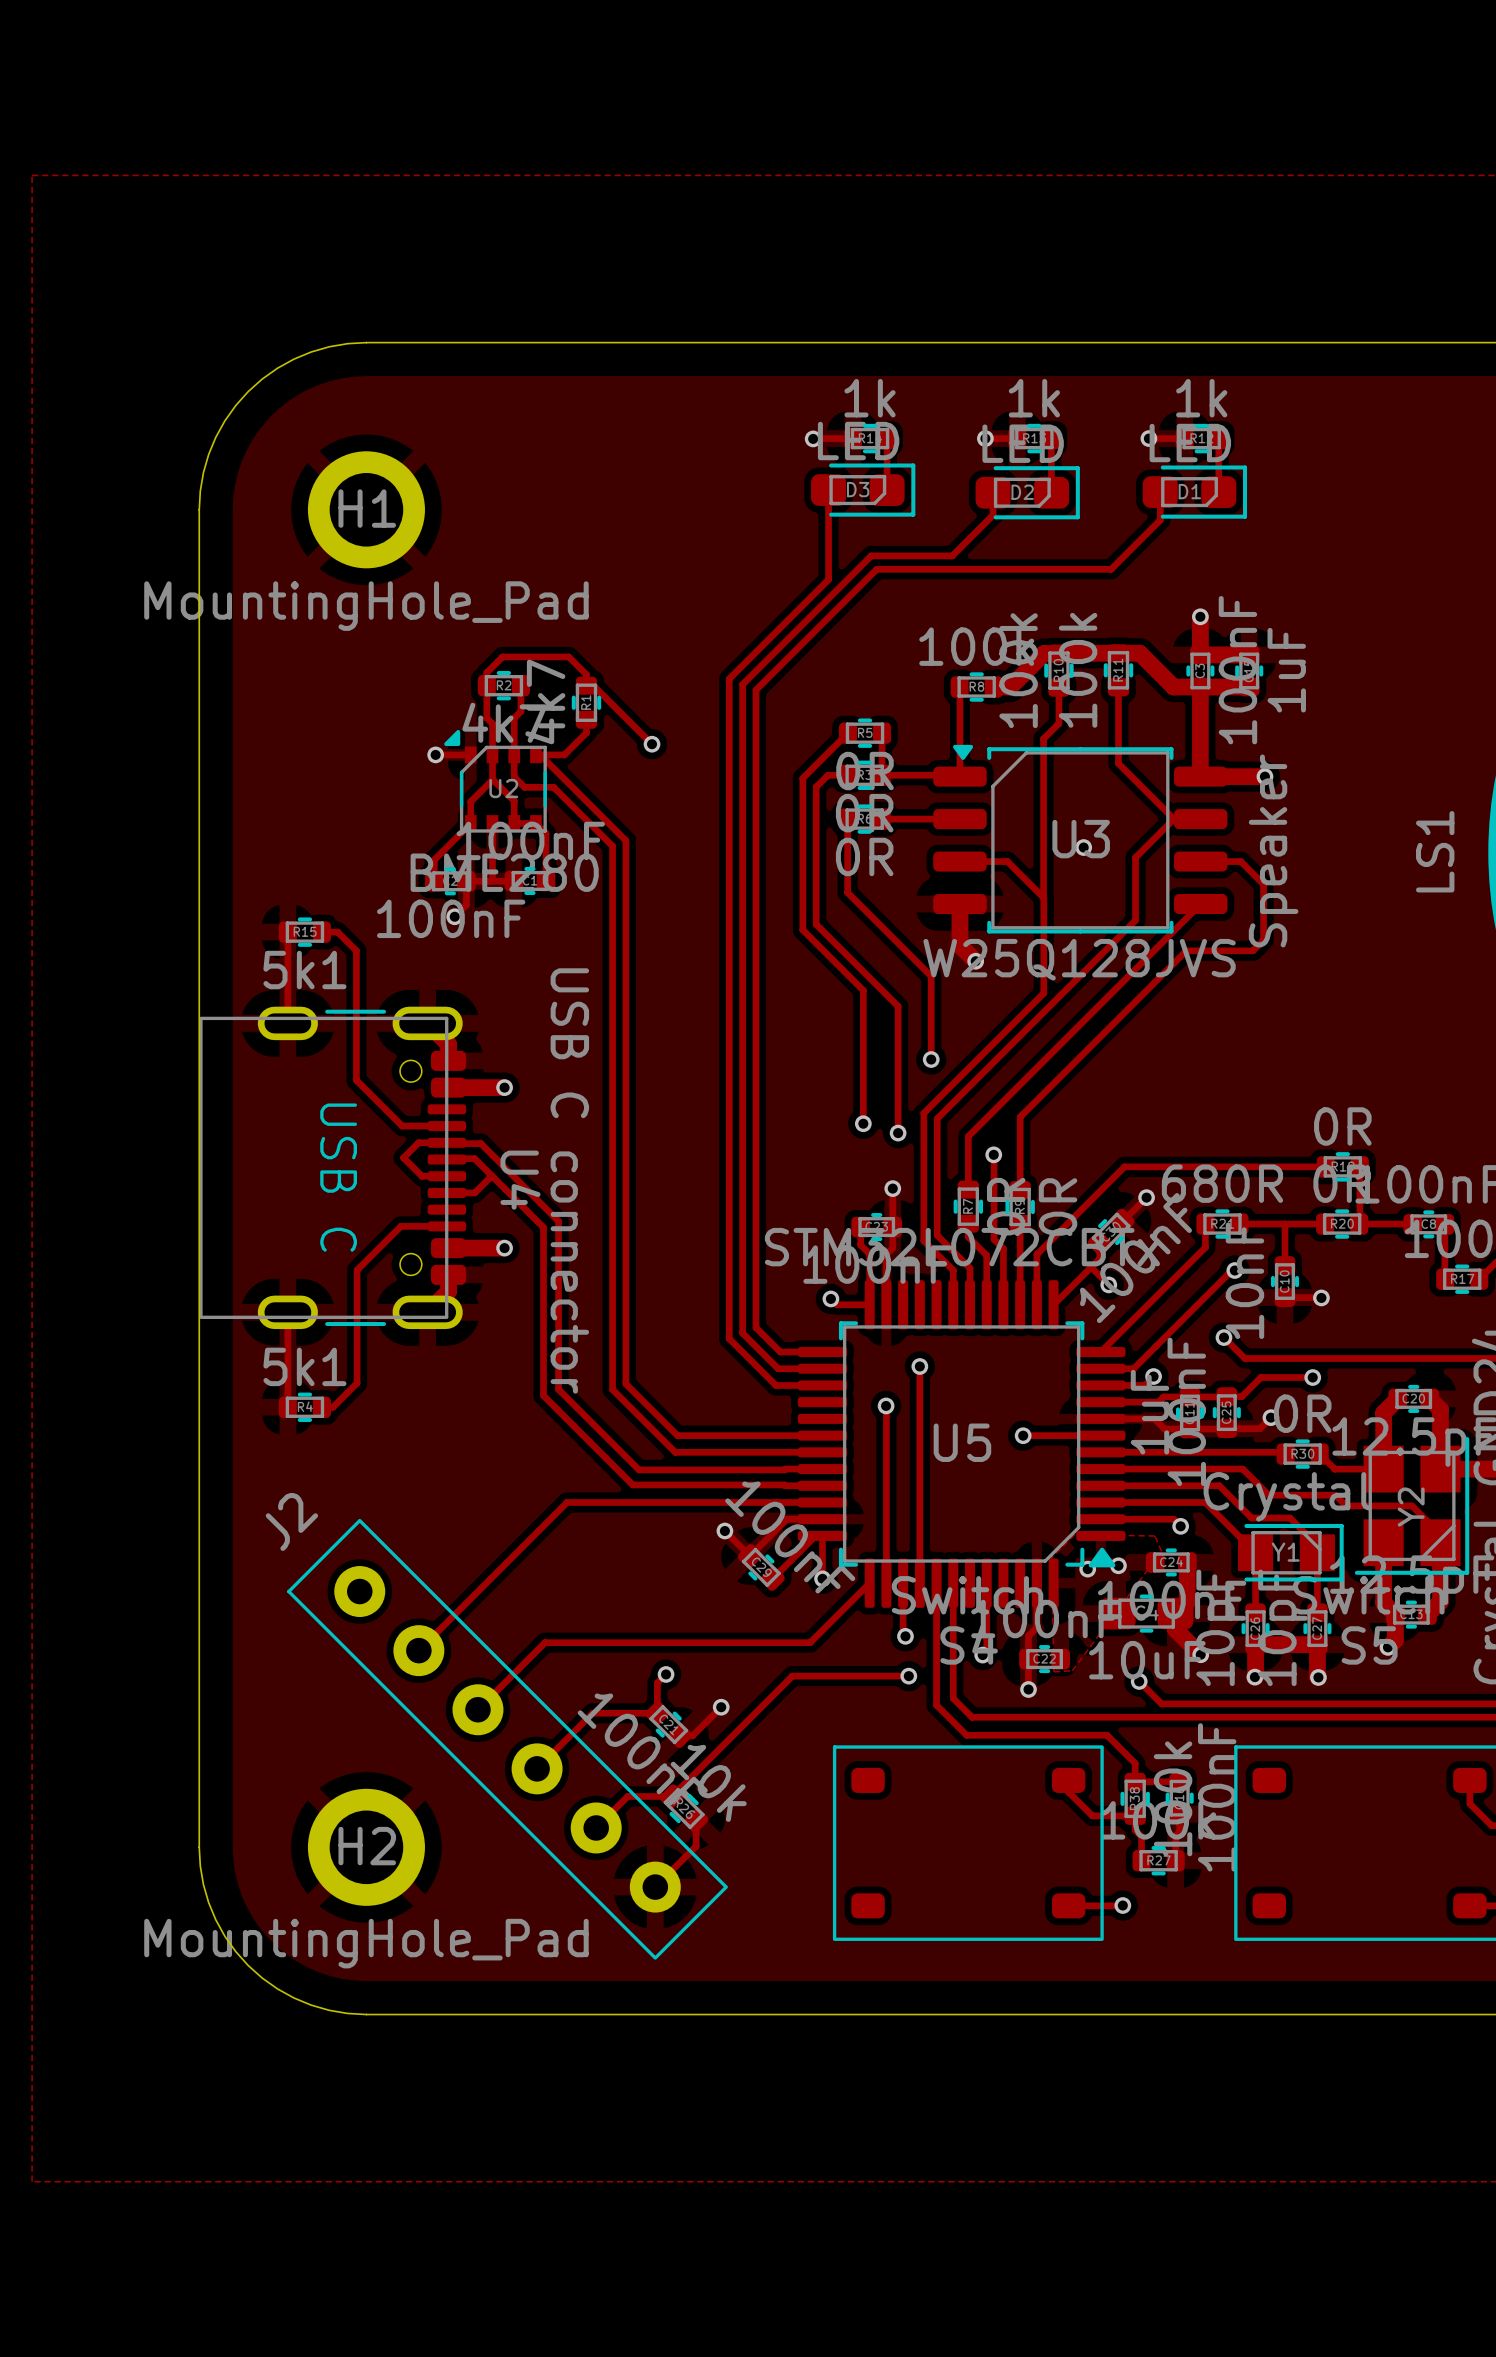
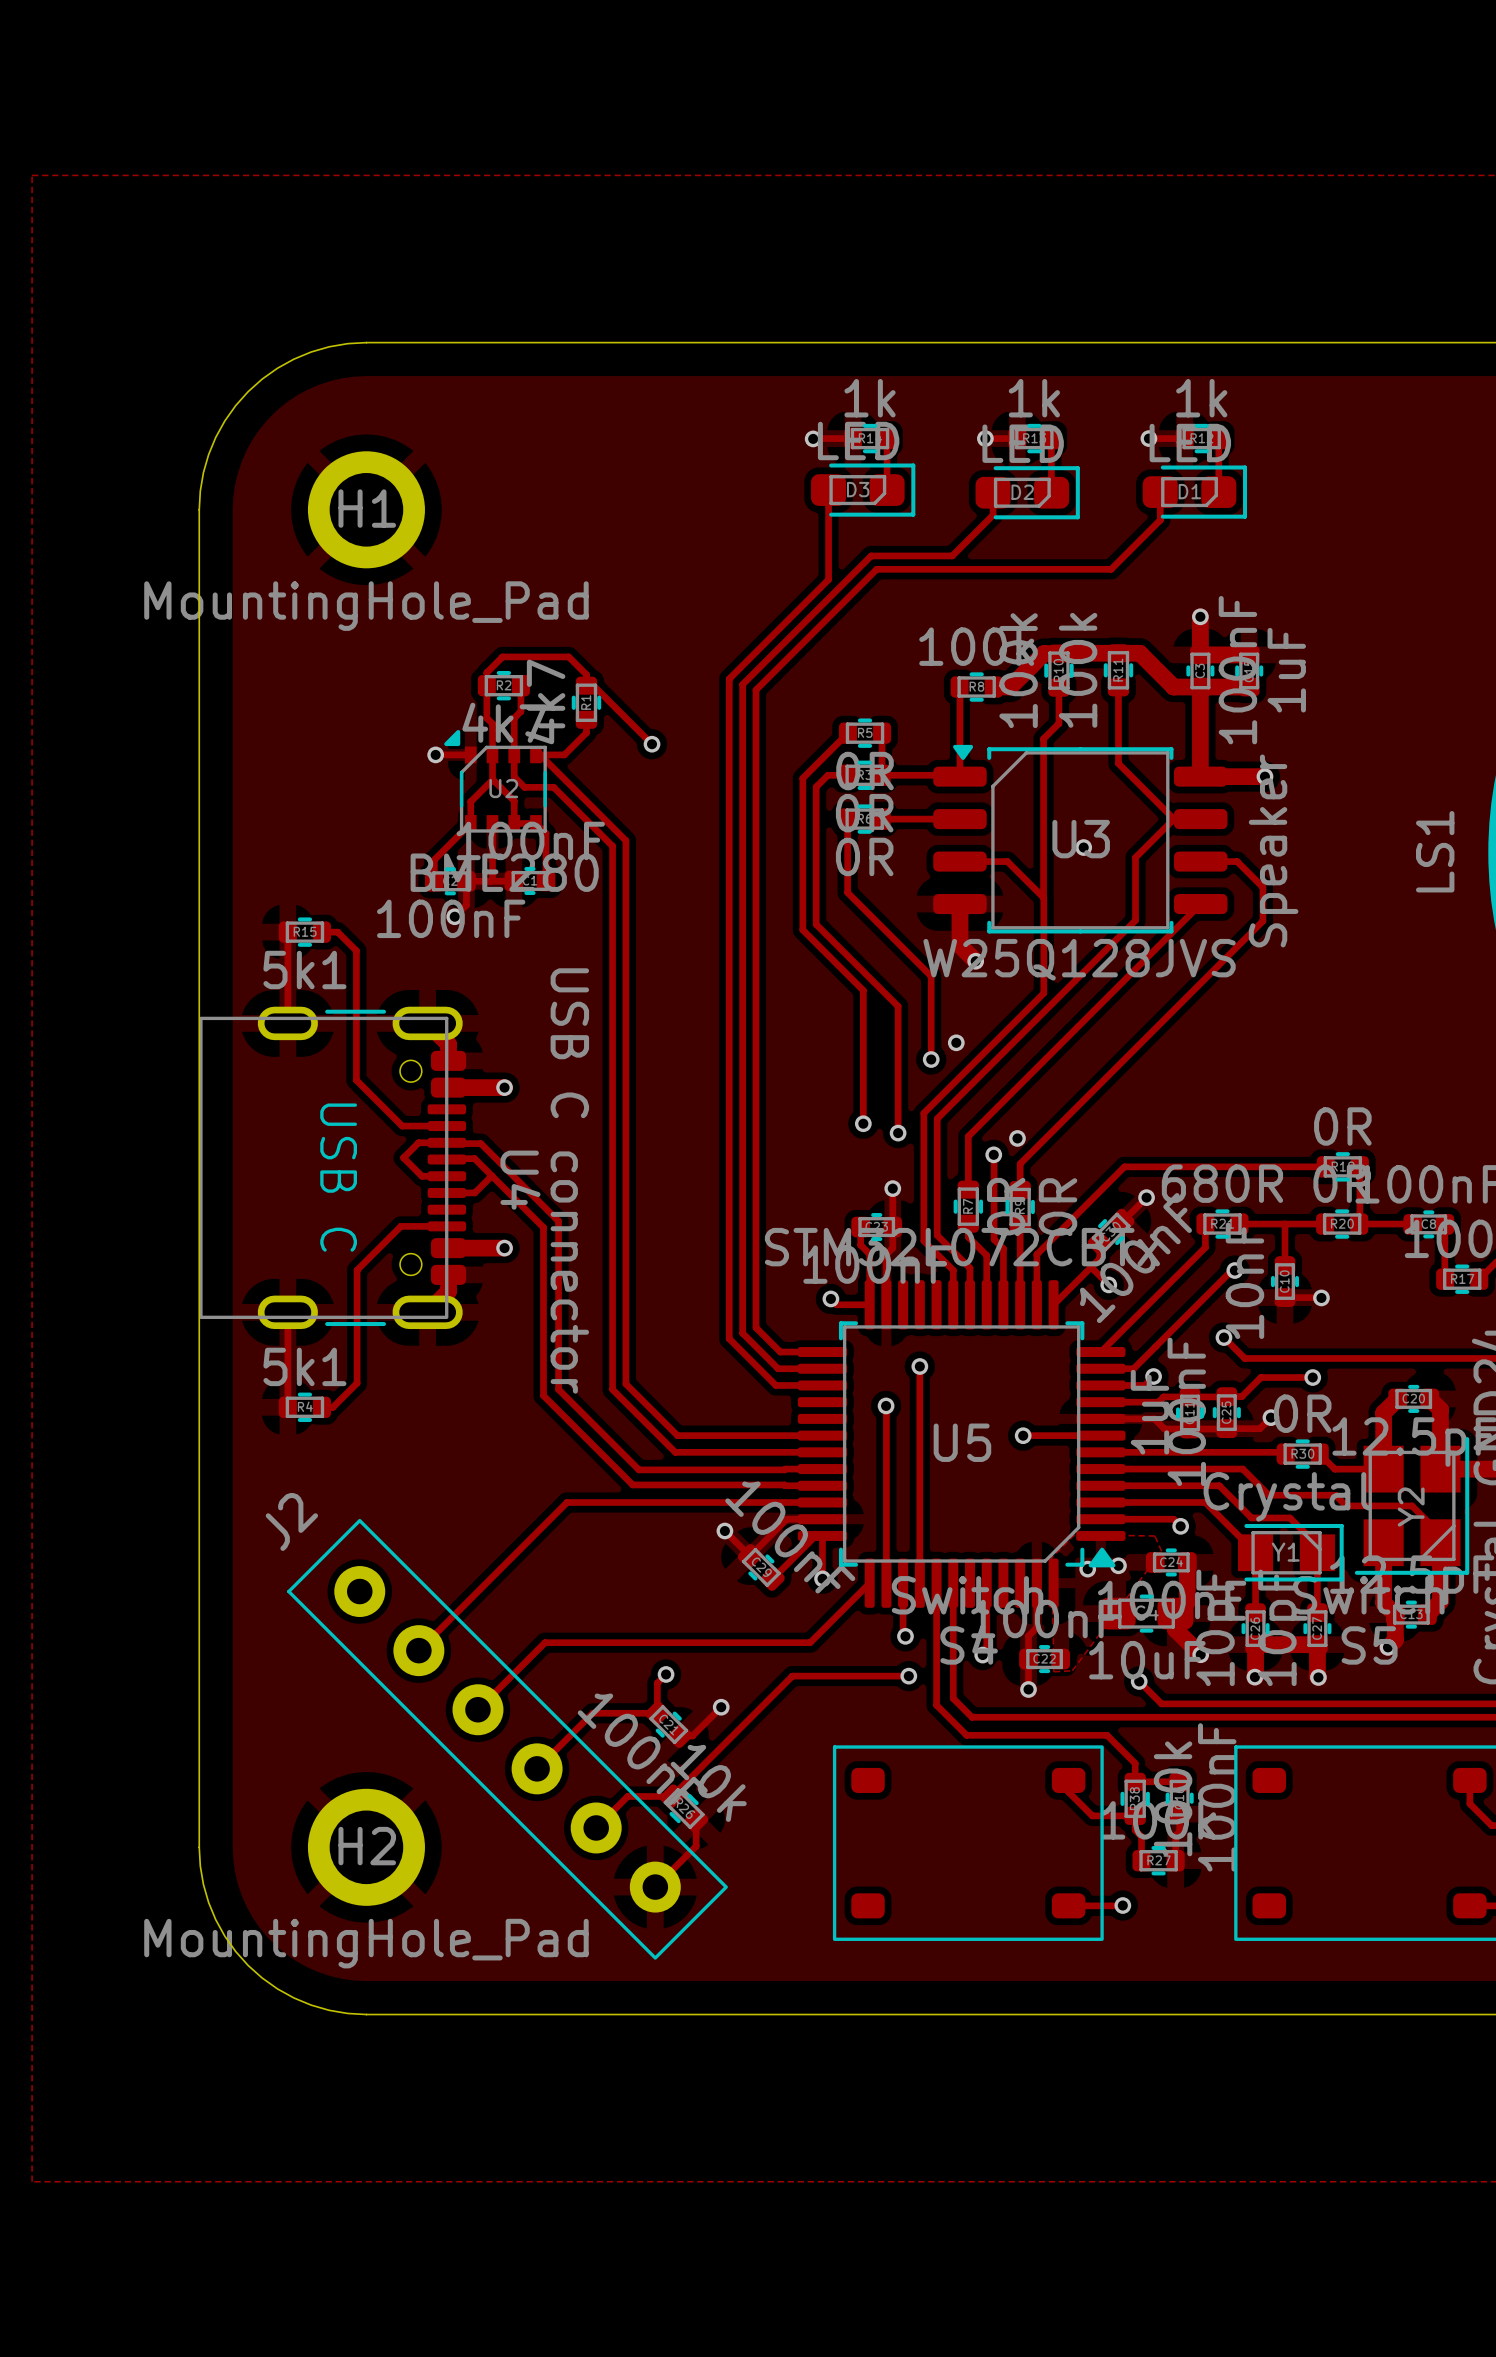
track: (1237, 861) (1240, 861) (1263, 884) (1263, 940) (1252, 950) (1186, 950) (1020, 1117) (1020, 1163) -> (1237, 861) (1262, 887) (1262, 921) (1020, 1163)
via: none -> (956, 1042)
via: none -> (1017, 1138)

